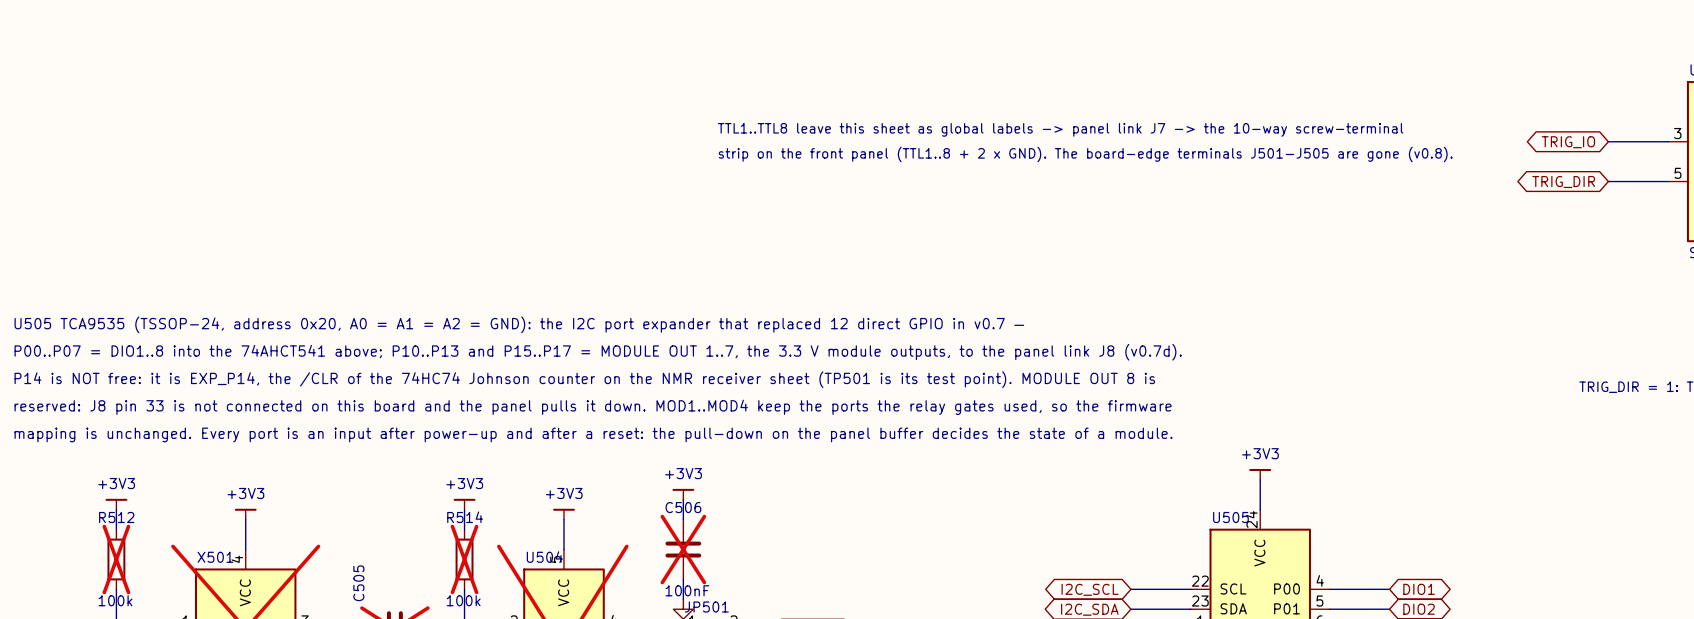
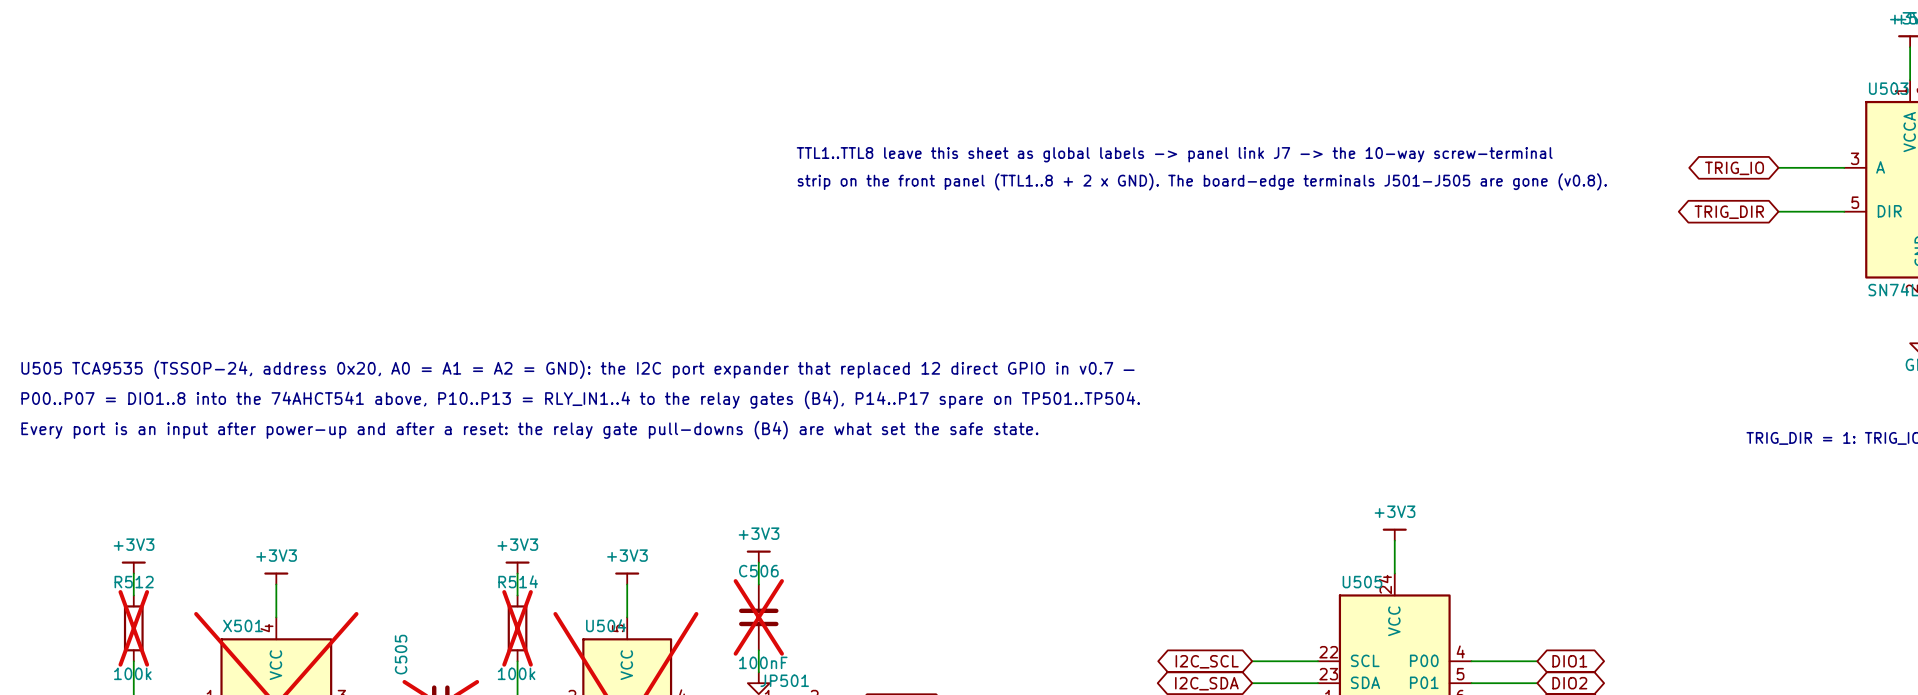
text: P00..P07 = DIO1..8 into the 74AHCT541 above; P10..P13 and P15..P17 = MODULE OUT 1..7, the 3.3 V module outputs, to the panel link J8 (v0.7d). (598, 352) -> P00..P07 = DIO1..8 into the 74AHCT541 above, P10..P13 = RLY_IN1..4 to the relay gates (B4), P14..P17 spare on TP501..TP504. (580, 399)
text: P14 is NOT free: it is EXP_P14, the /CLR of the 74HC74 Johnson counter on the NMR receiver sheet (TP501 is its test point). MODULE OUT 8 is (584, 379) -> Every port is an input after power-up and after a reset: the relay gate pull-downs (B4) are what set the safe state. (529, 430)
text: reserved: J8 pin 33 is not connected on this board and the panel pulls it down. MOD1..MOD4 keep the ports the relay gates used, so the firmware (593, 407) -> none
text: mapping is unchanged. Every port is an input after power-up and after a reset: the pull-down on the panel buffer decides the state of a module. (593, 434) -> none

